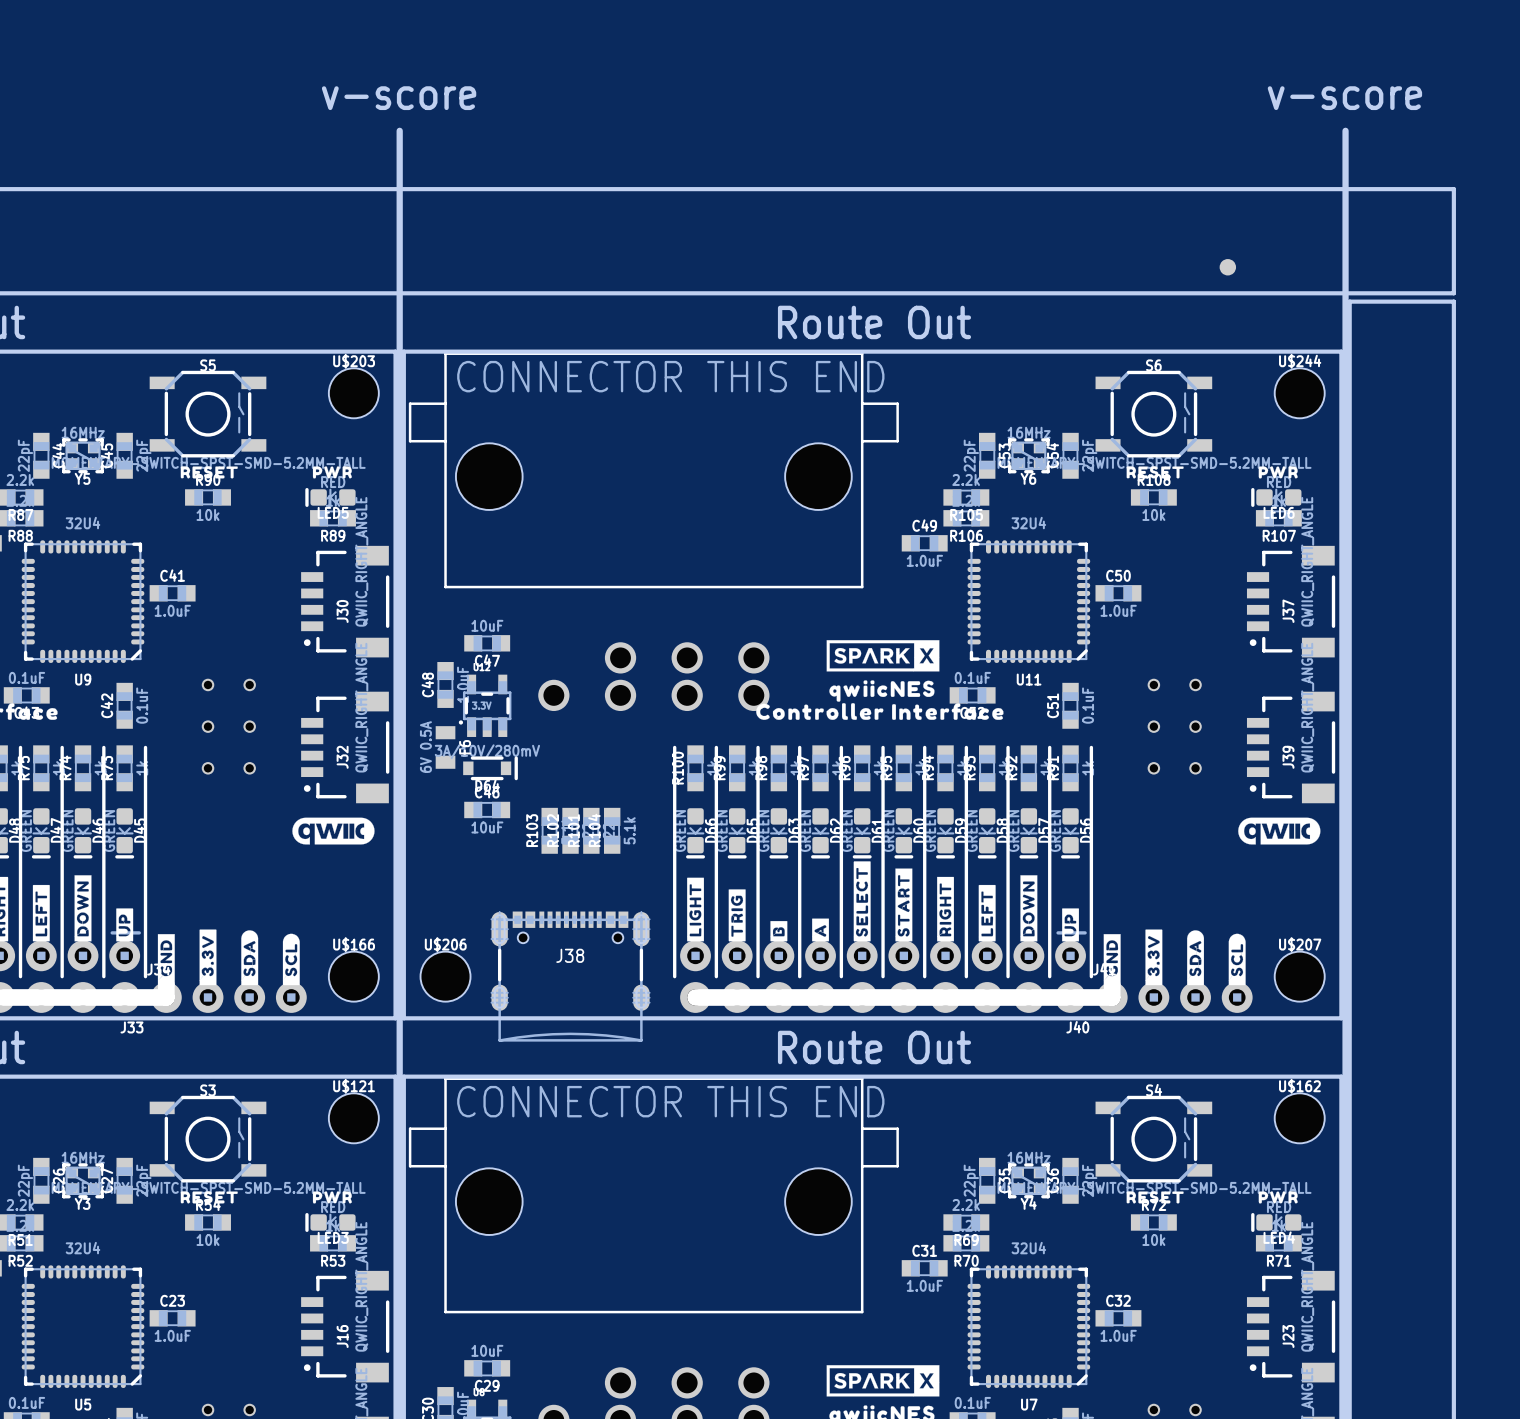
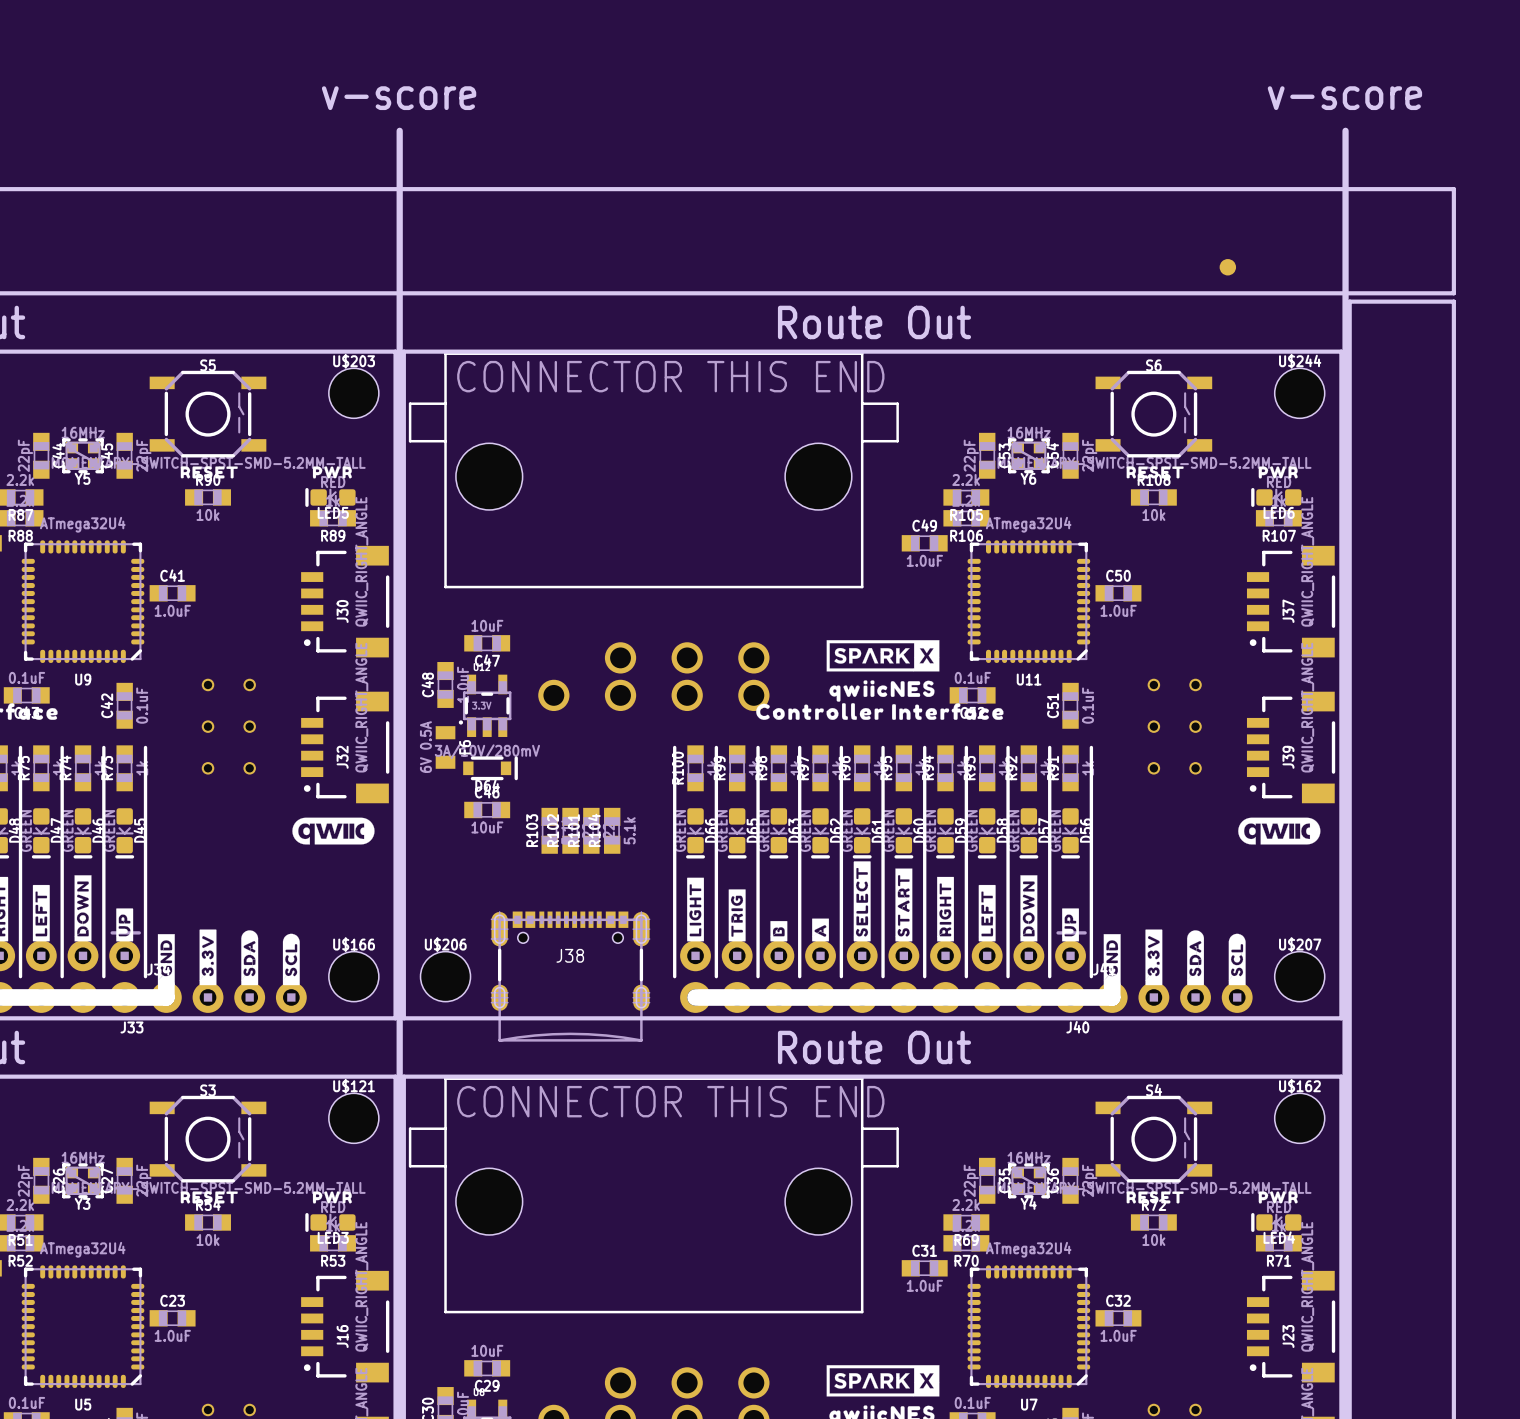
U9 value: 32U4 (83, 523) -> ATmega32U4 (82, 524)
U11 value: 32U4 (1028, 523) -> ATmega32U4 (1028, 524)
U5 value: 32U4 (83, 1248) -> ATmega32U4 (82, 1249)
U7 value: 32U4 (1028, 1248) -> ATmega32U4 (1028, 1249)

